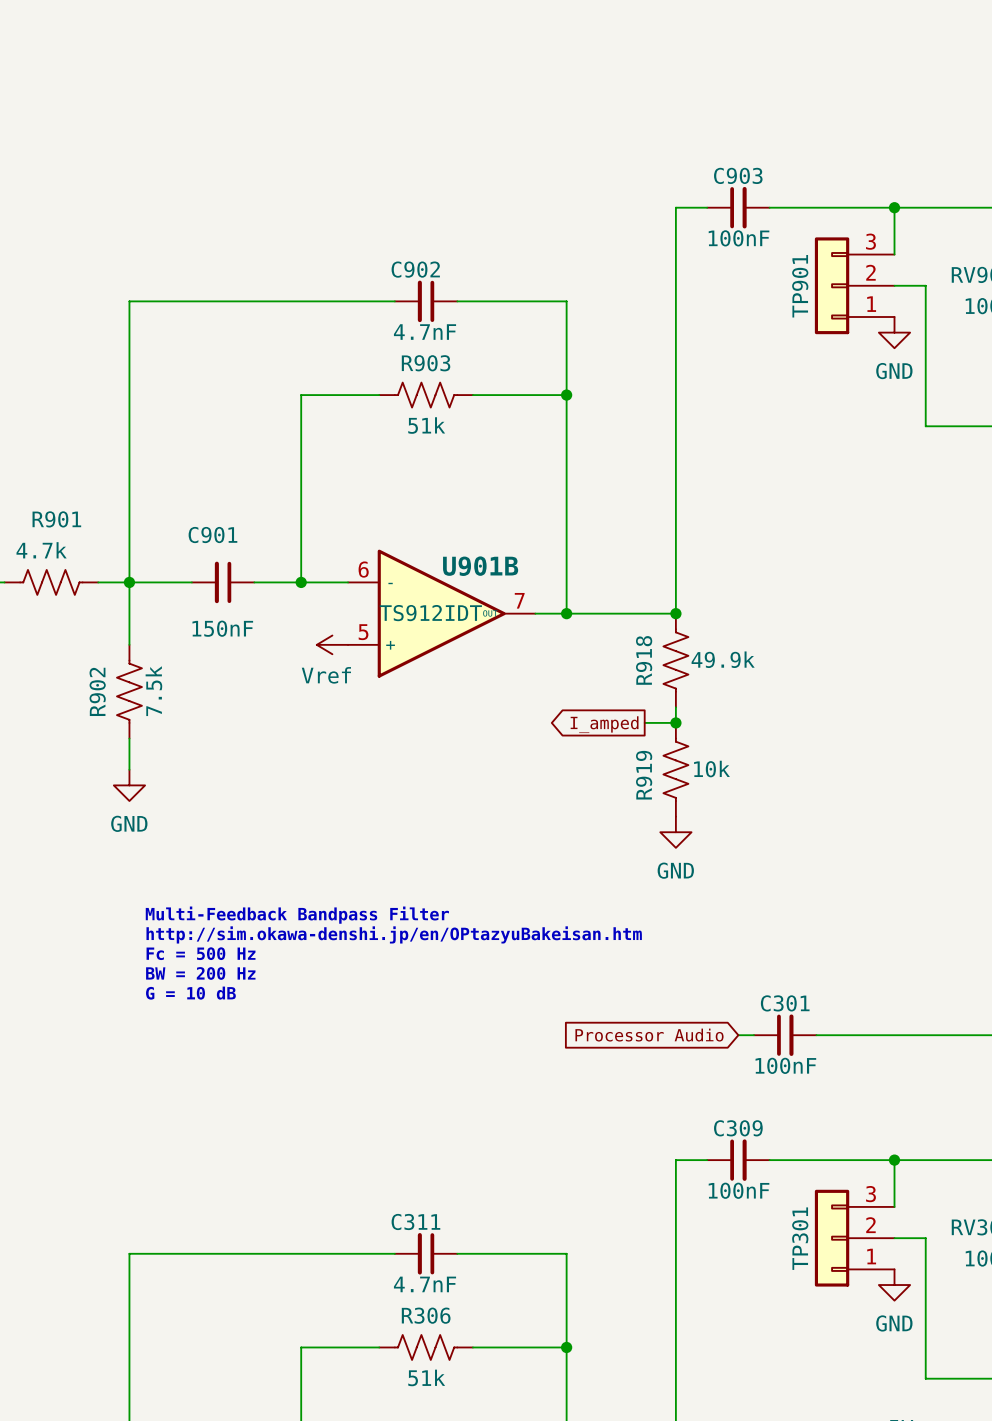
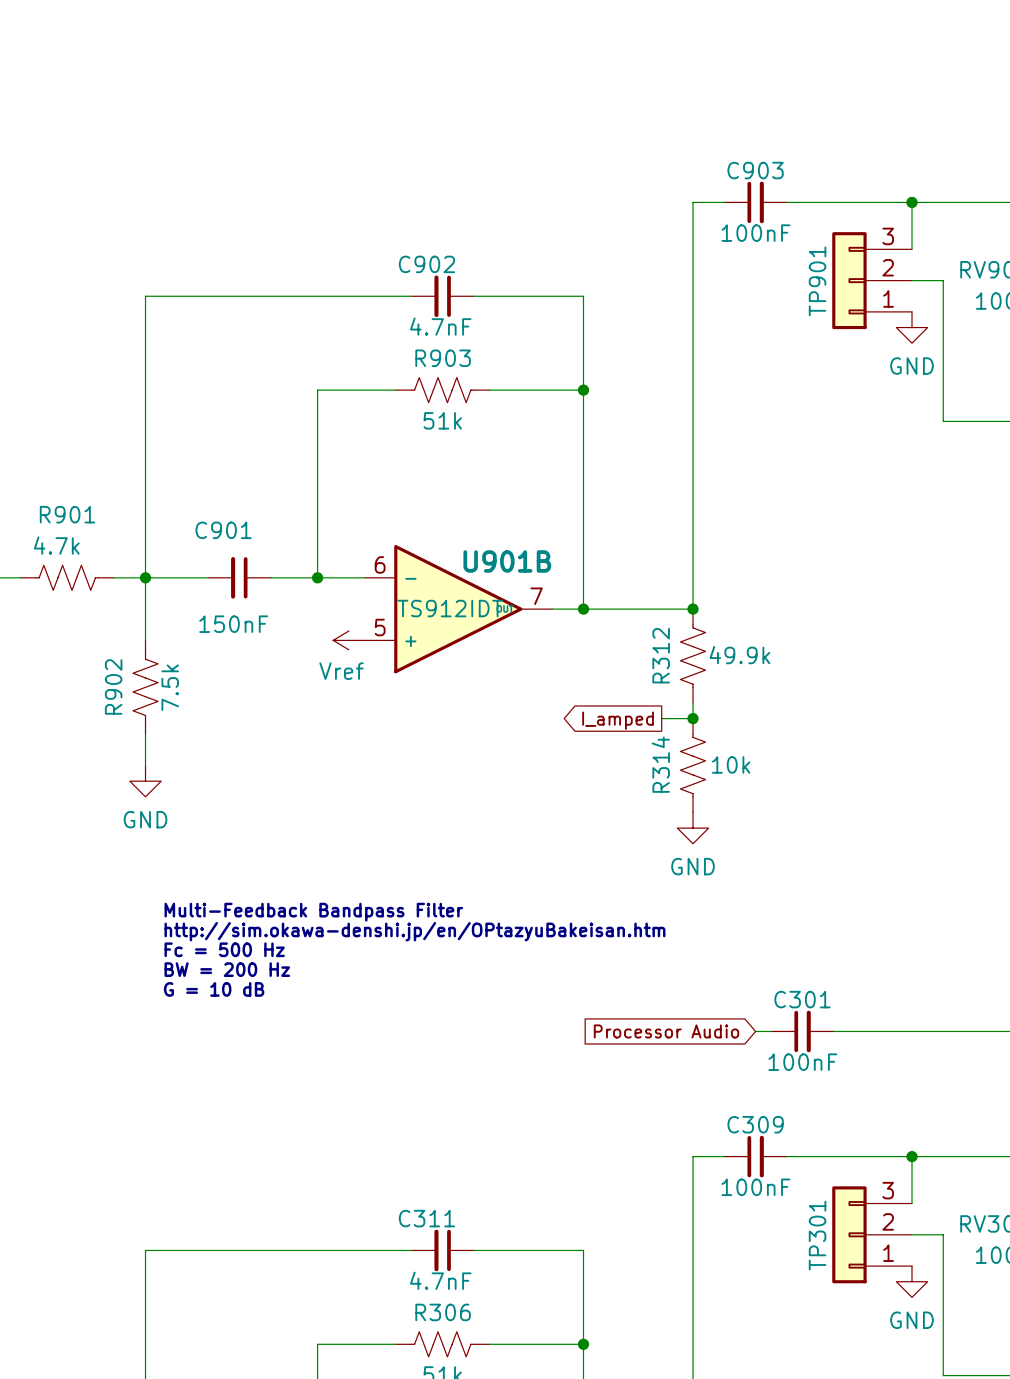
R918 name: R918 (644, 660) -> R312 (661, 655)
R919 name: R919 (644, 775) -> R314 (660, 764)

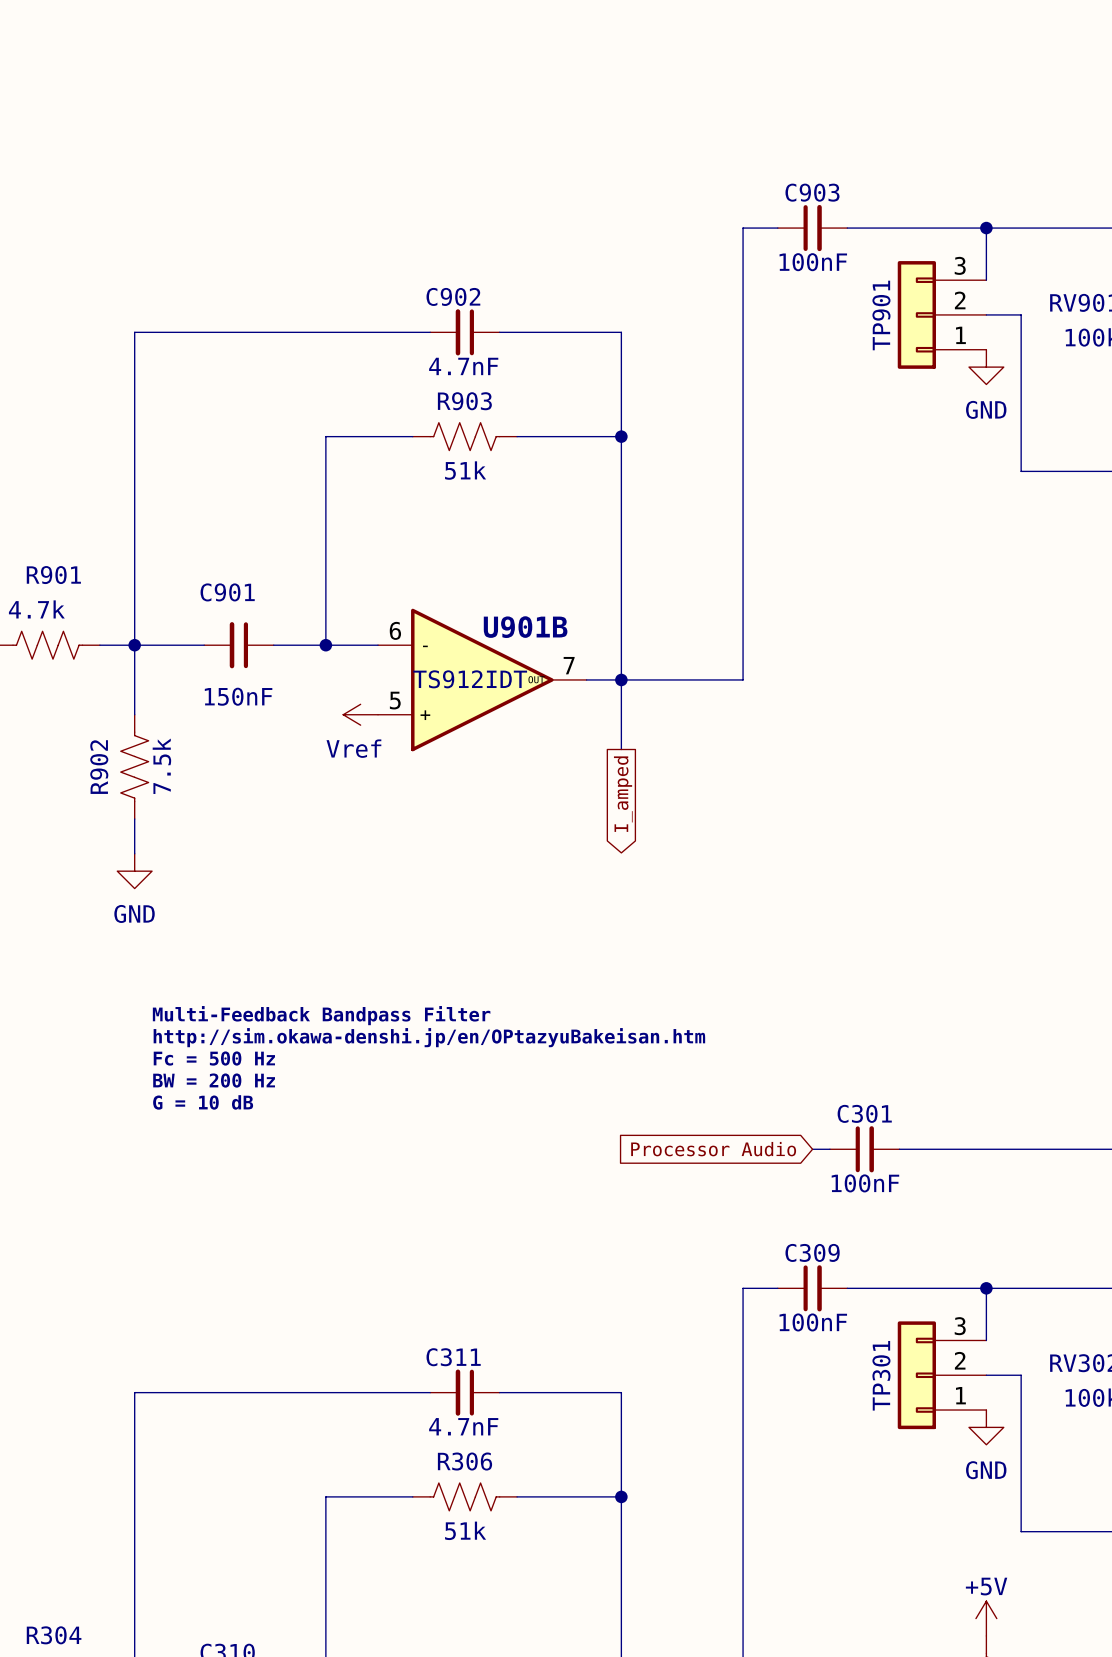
wire: none -> (621, 679) (621, 749)
junction: (693, 609) -> none
R312: 49.9k (693, 656) -> none
wire: (693, 702) (693, 718) (661, 718) -> none
junction: (693, 718) -> none
global label rotation: 0° (618, 720) -> 90° counterclockwise (623, 794)
R314: 10k (693, 765) -> none
power symbol: GND (693, 828) -> none

